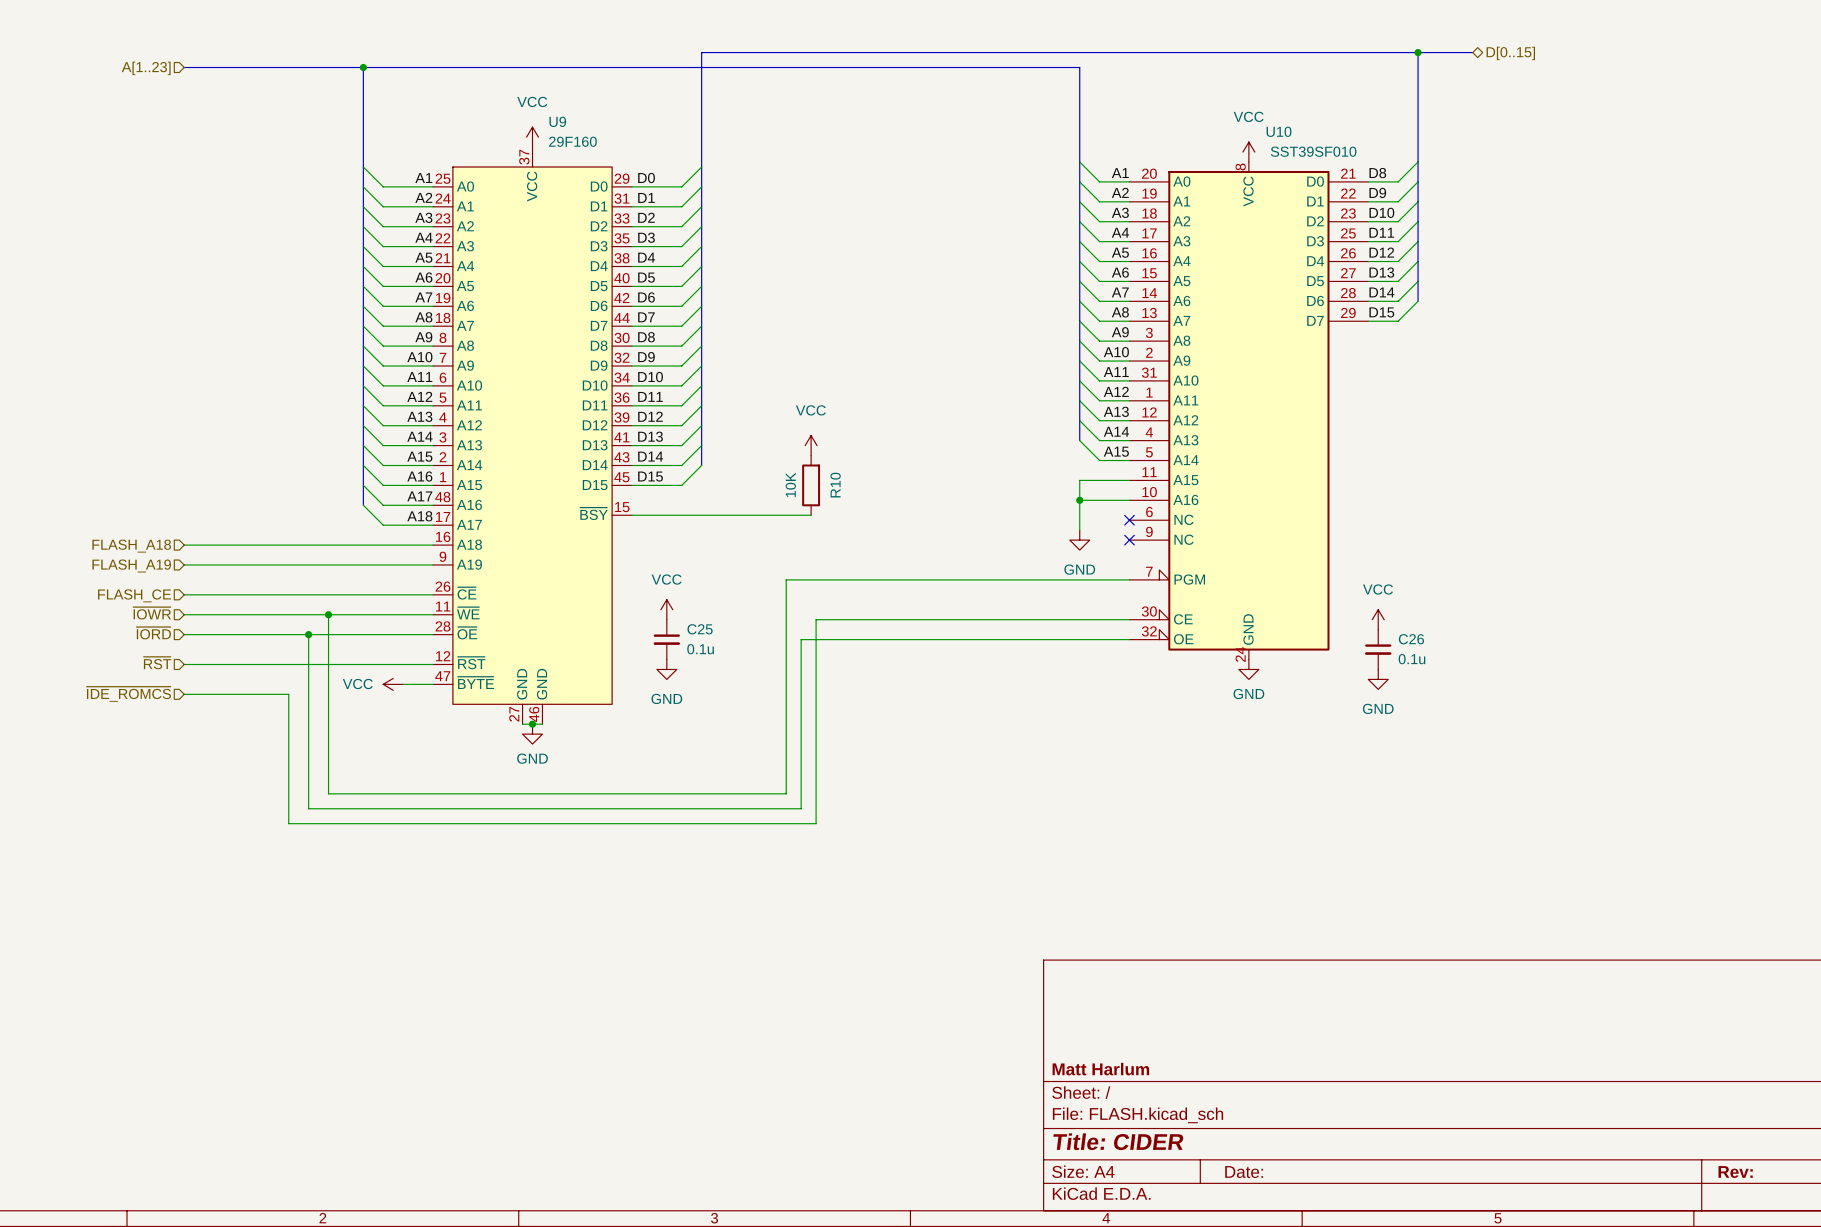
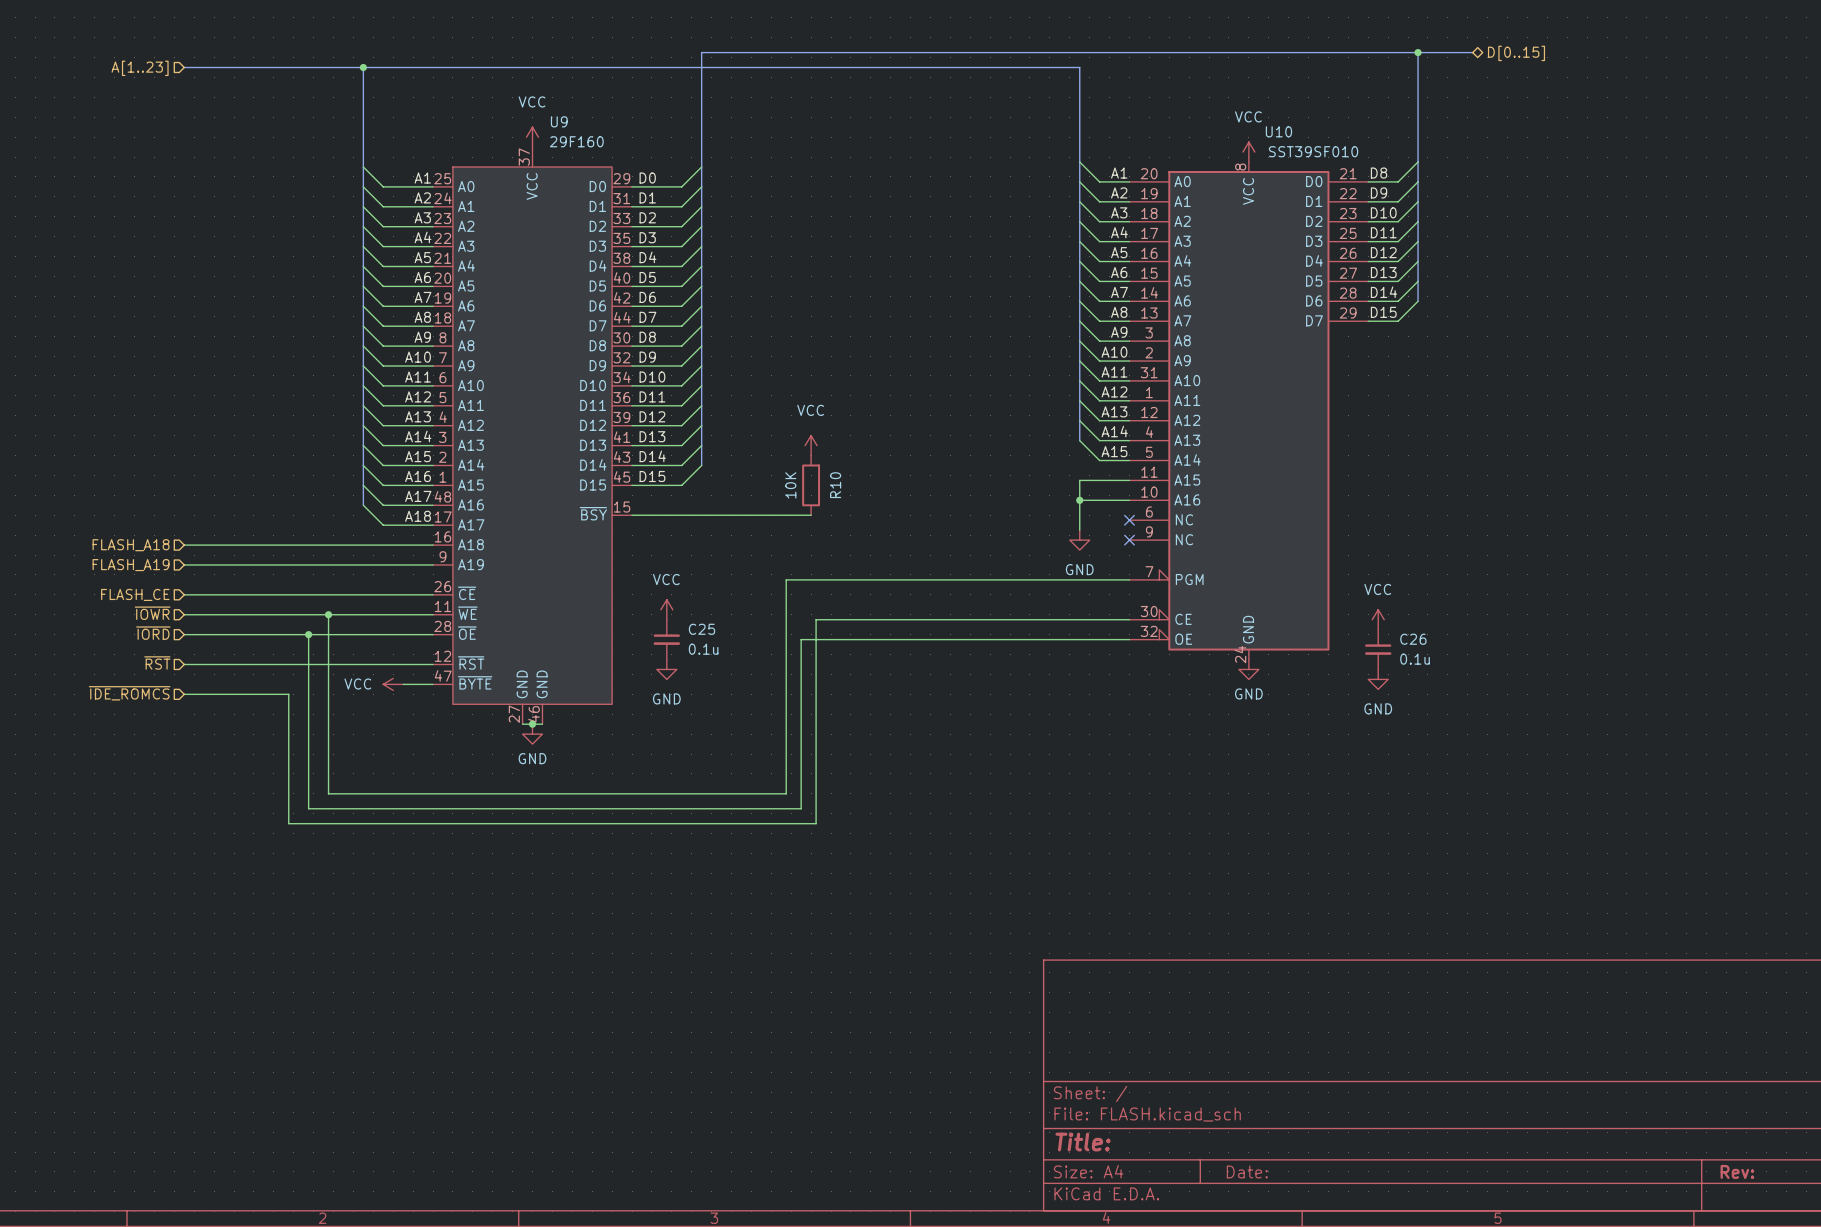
title block: Matt Harlum (1100, 1069) -> none
title block: Title: CIDER (1118, 1141) -> Title: (1083, 1142)

